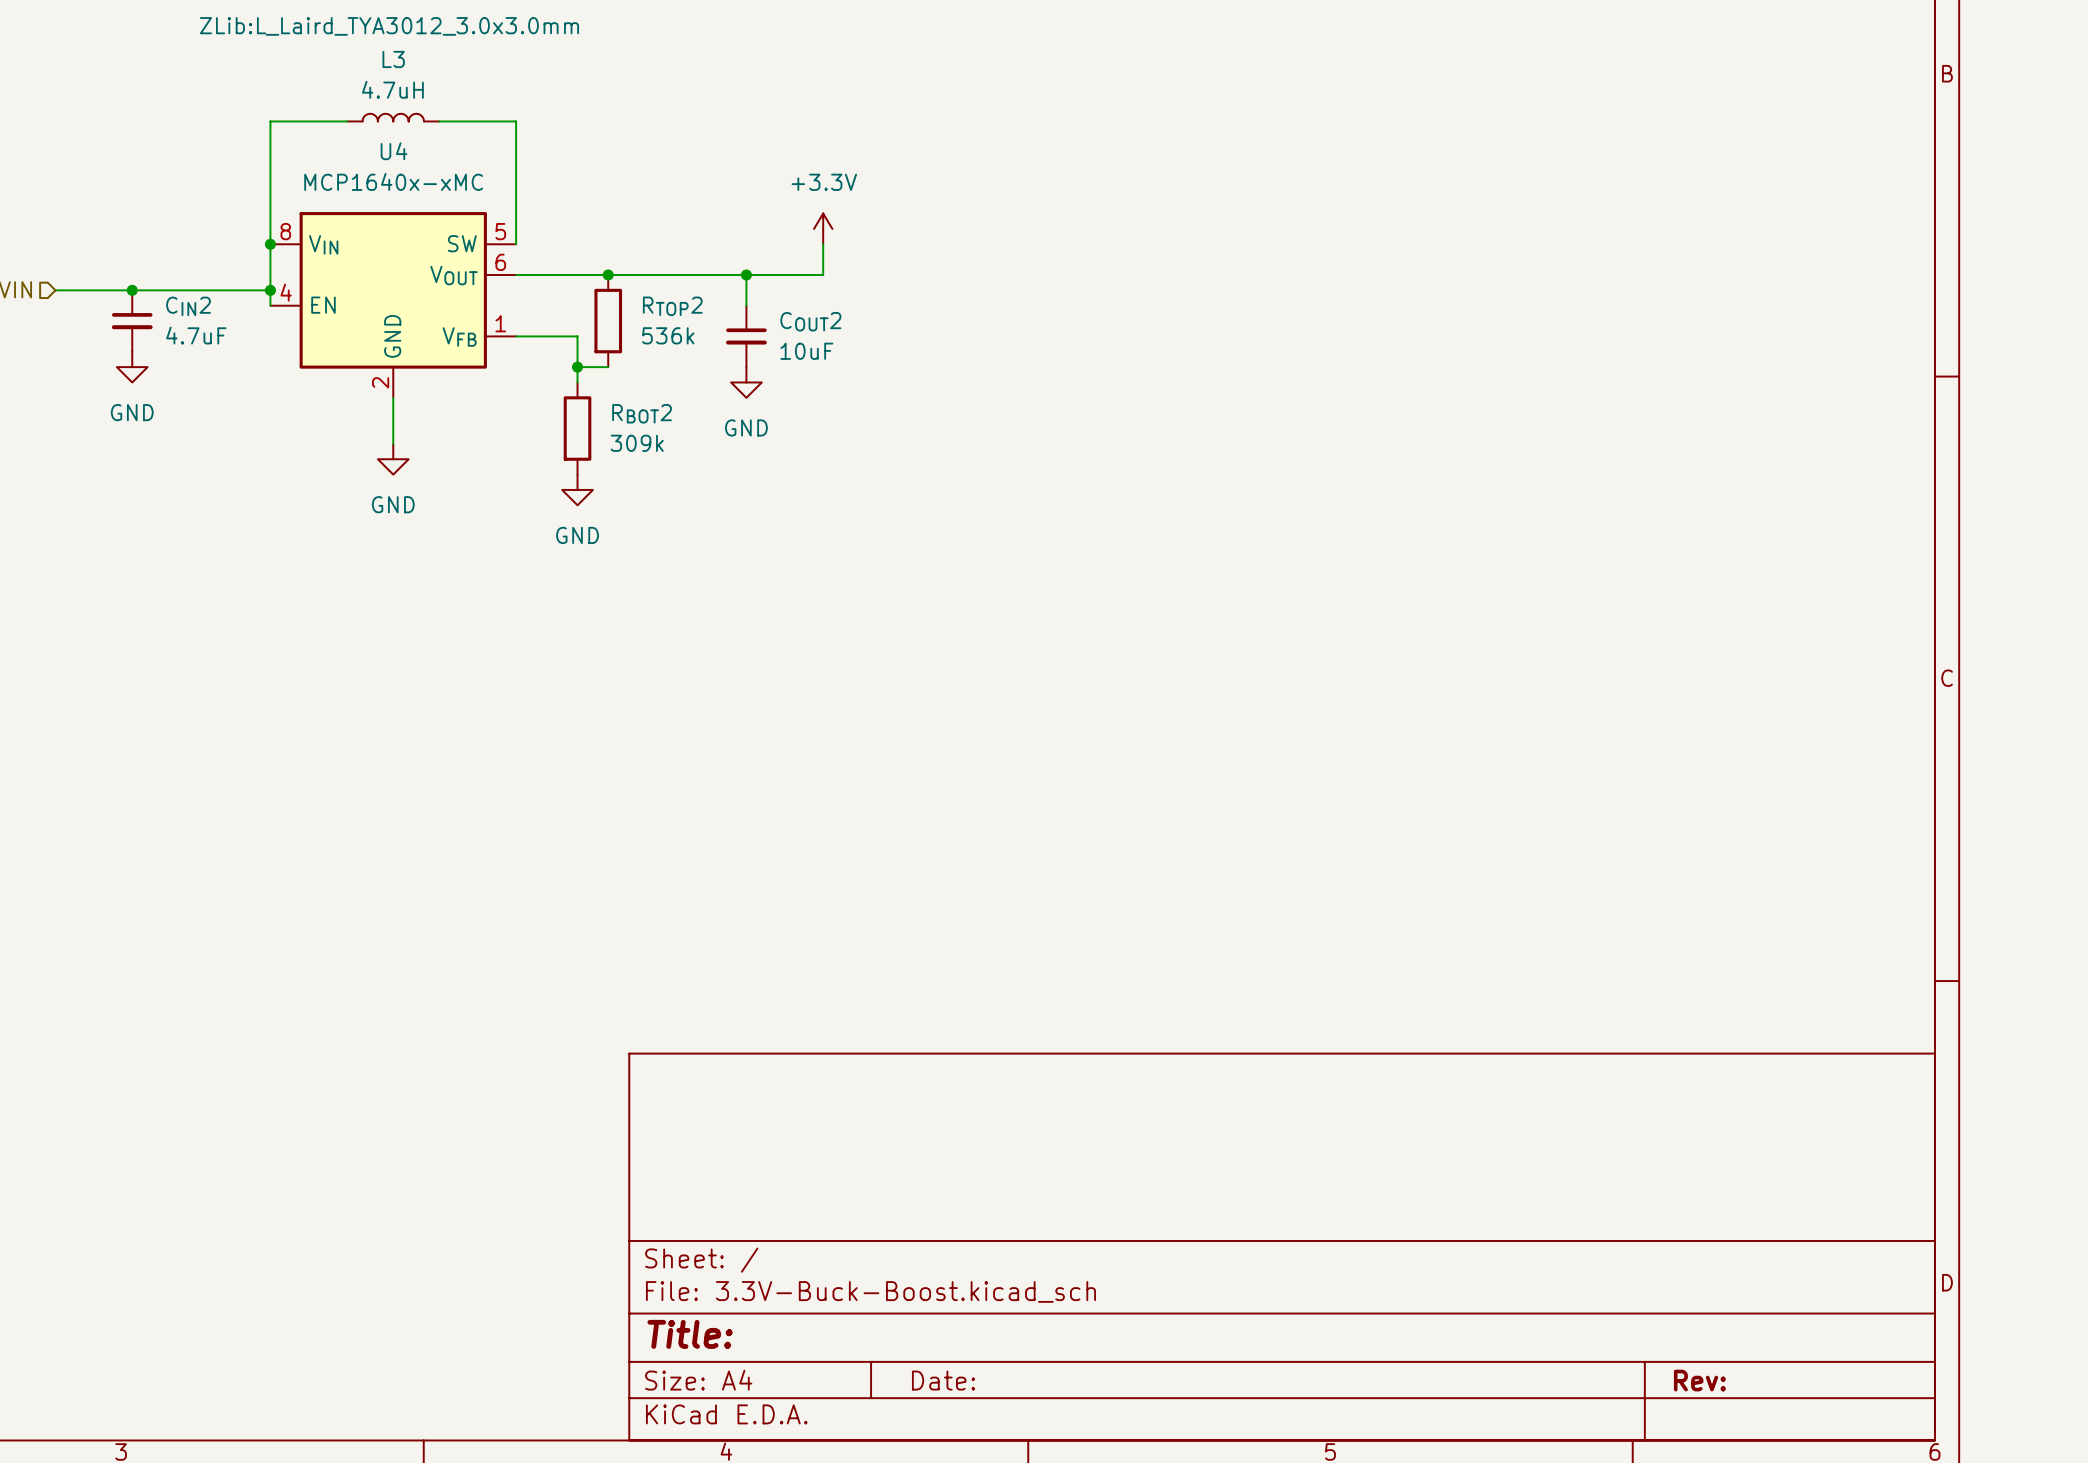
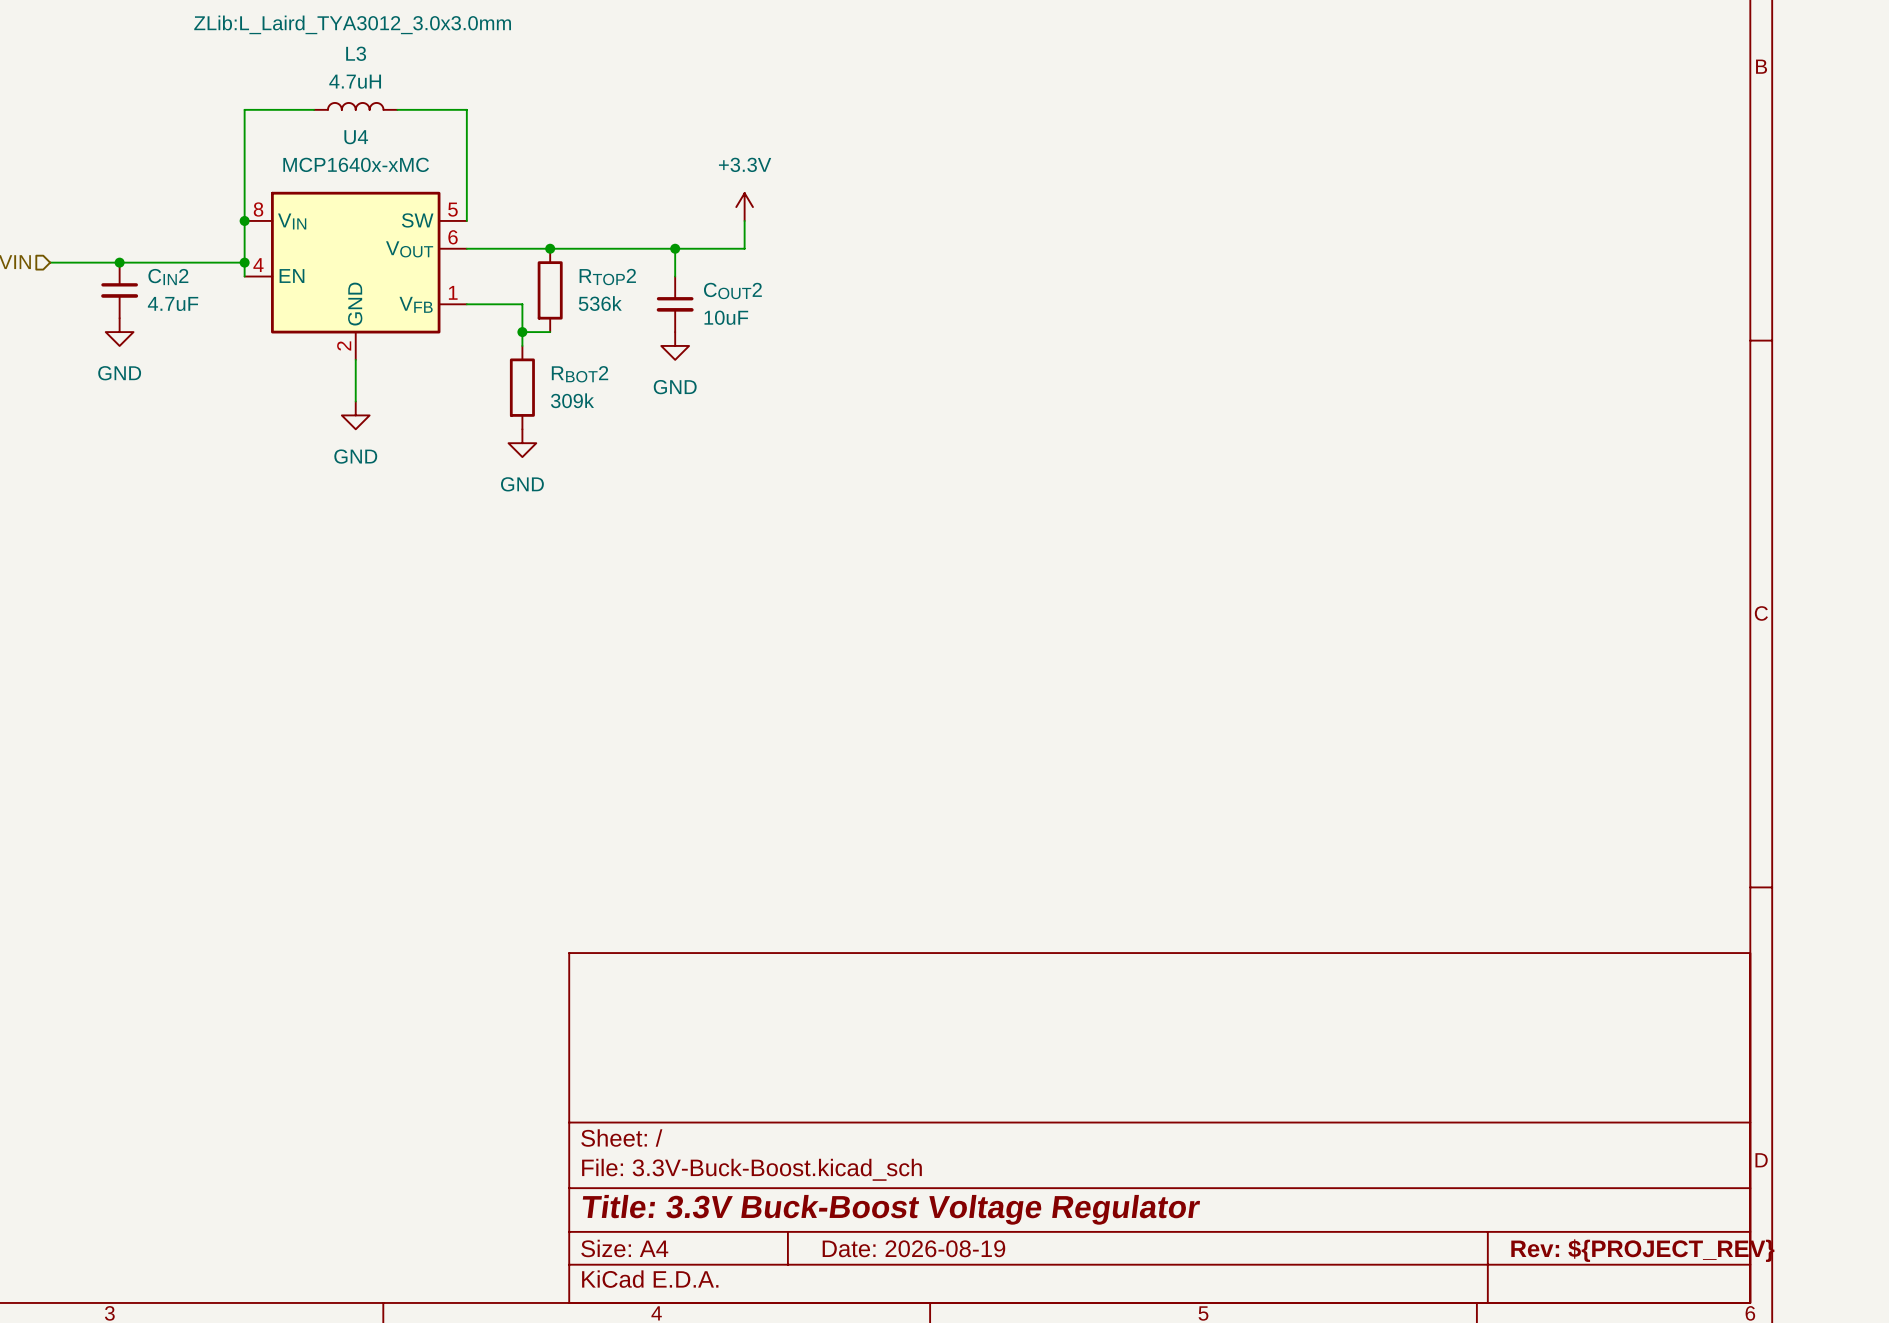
title block: Title: (690, 1334) -> Title: 3.3V Buck-Boost Voltage Regulator (891, 1209)
title block: Date: (943, 1380) -> Date: 2026-08-19 (913, 1248)
title block: Rev: (1699, 1380) -> Rev: ${PROJECT_REV} (1642, 1250)

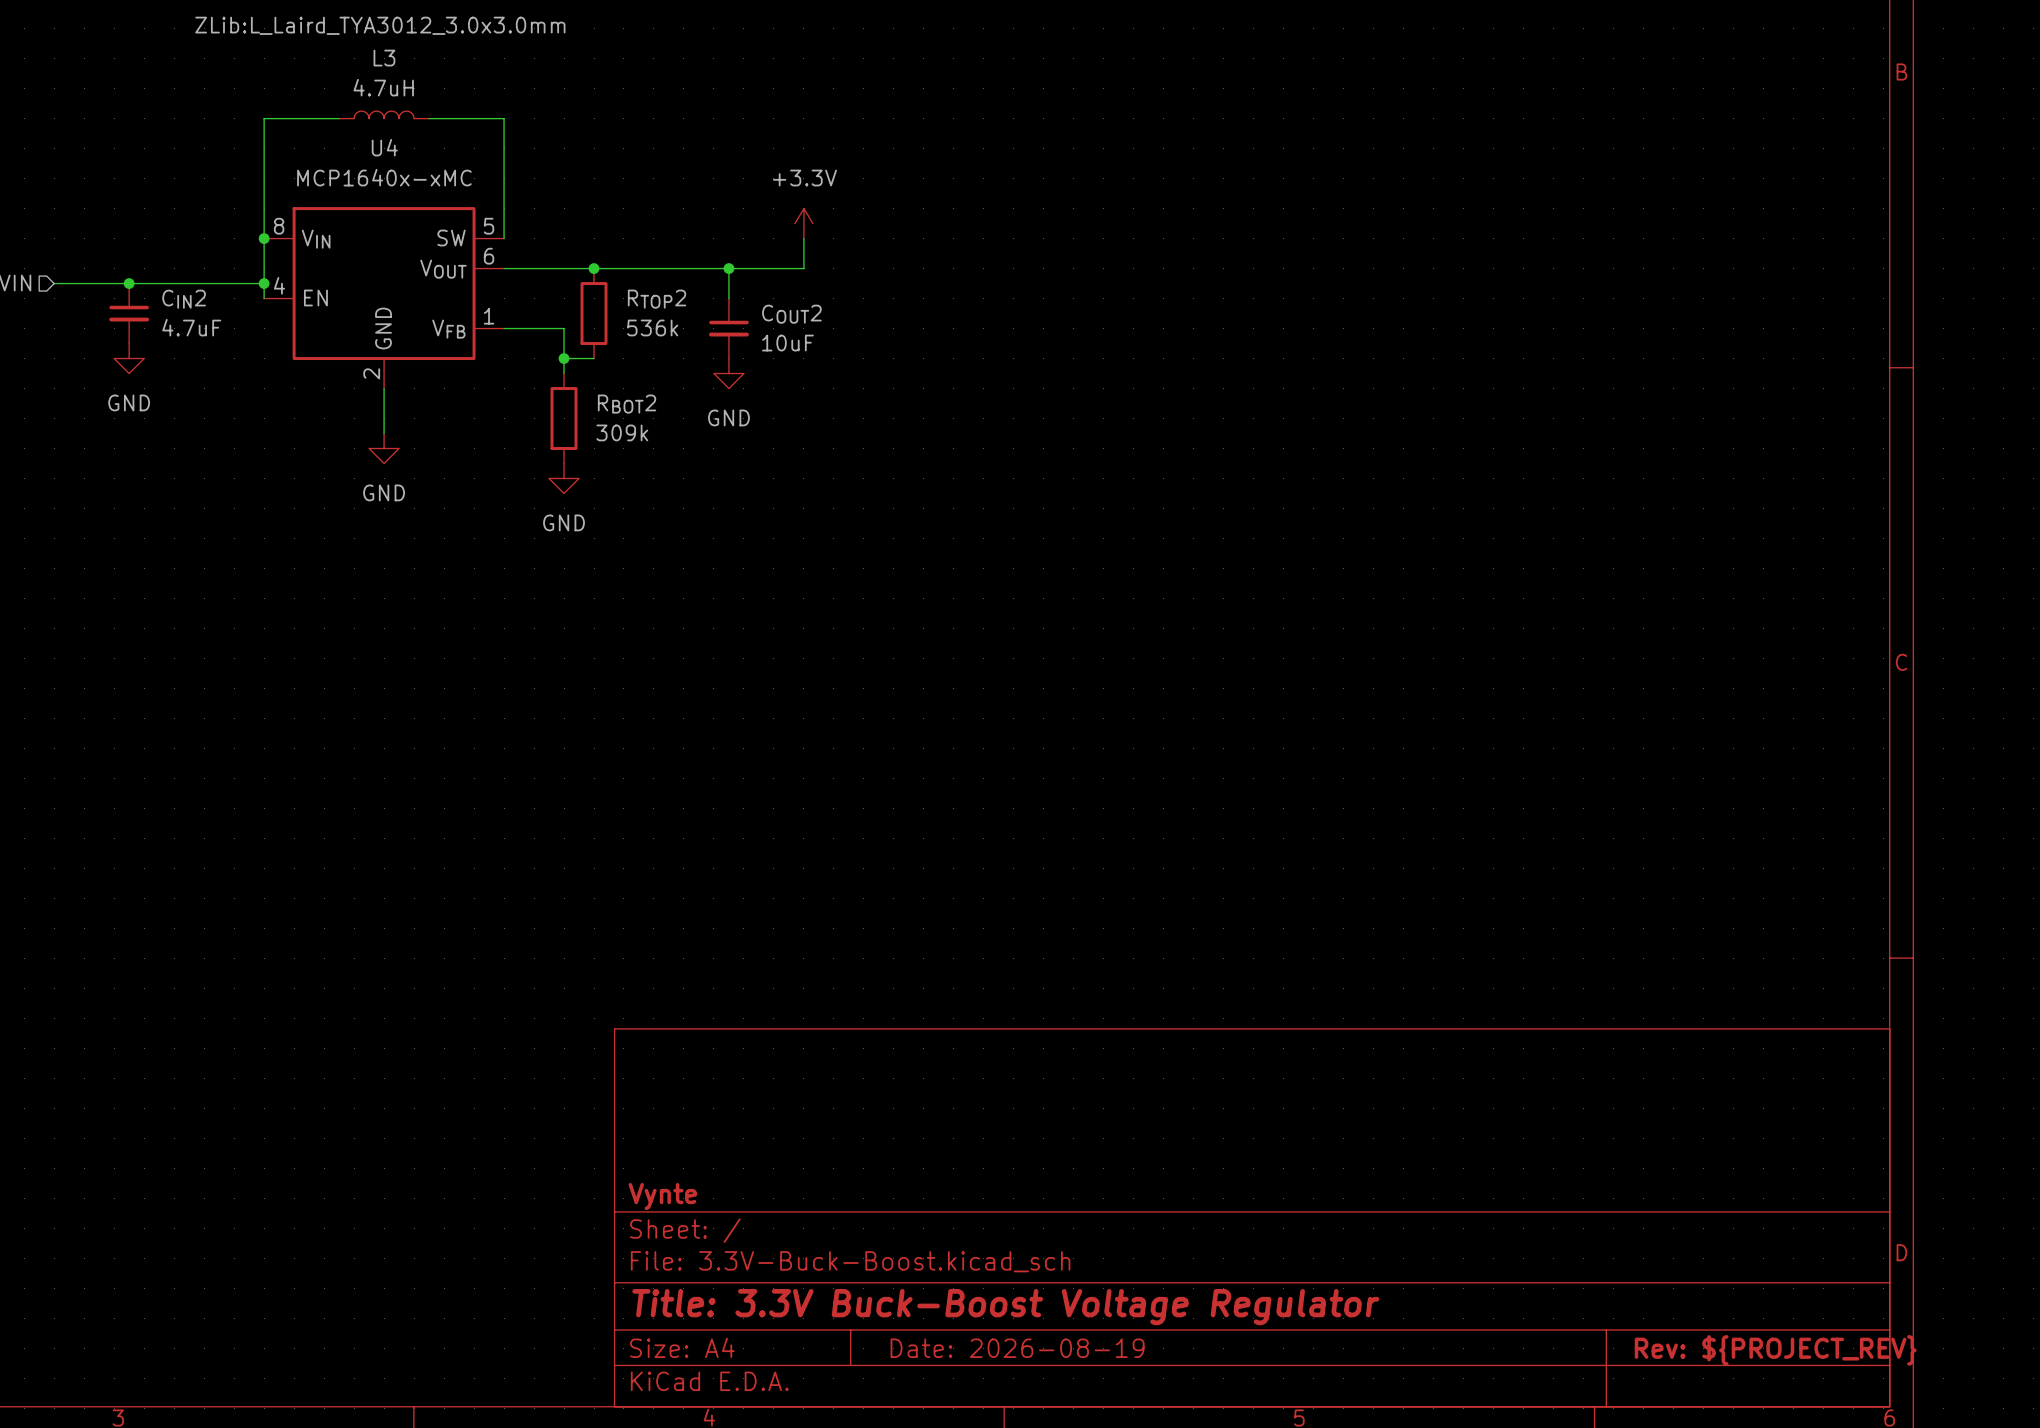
title block: none -> Vynte (662, 1196)

